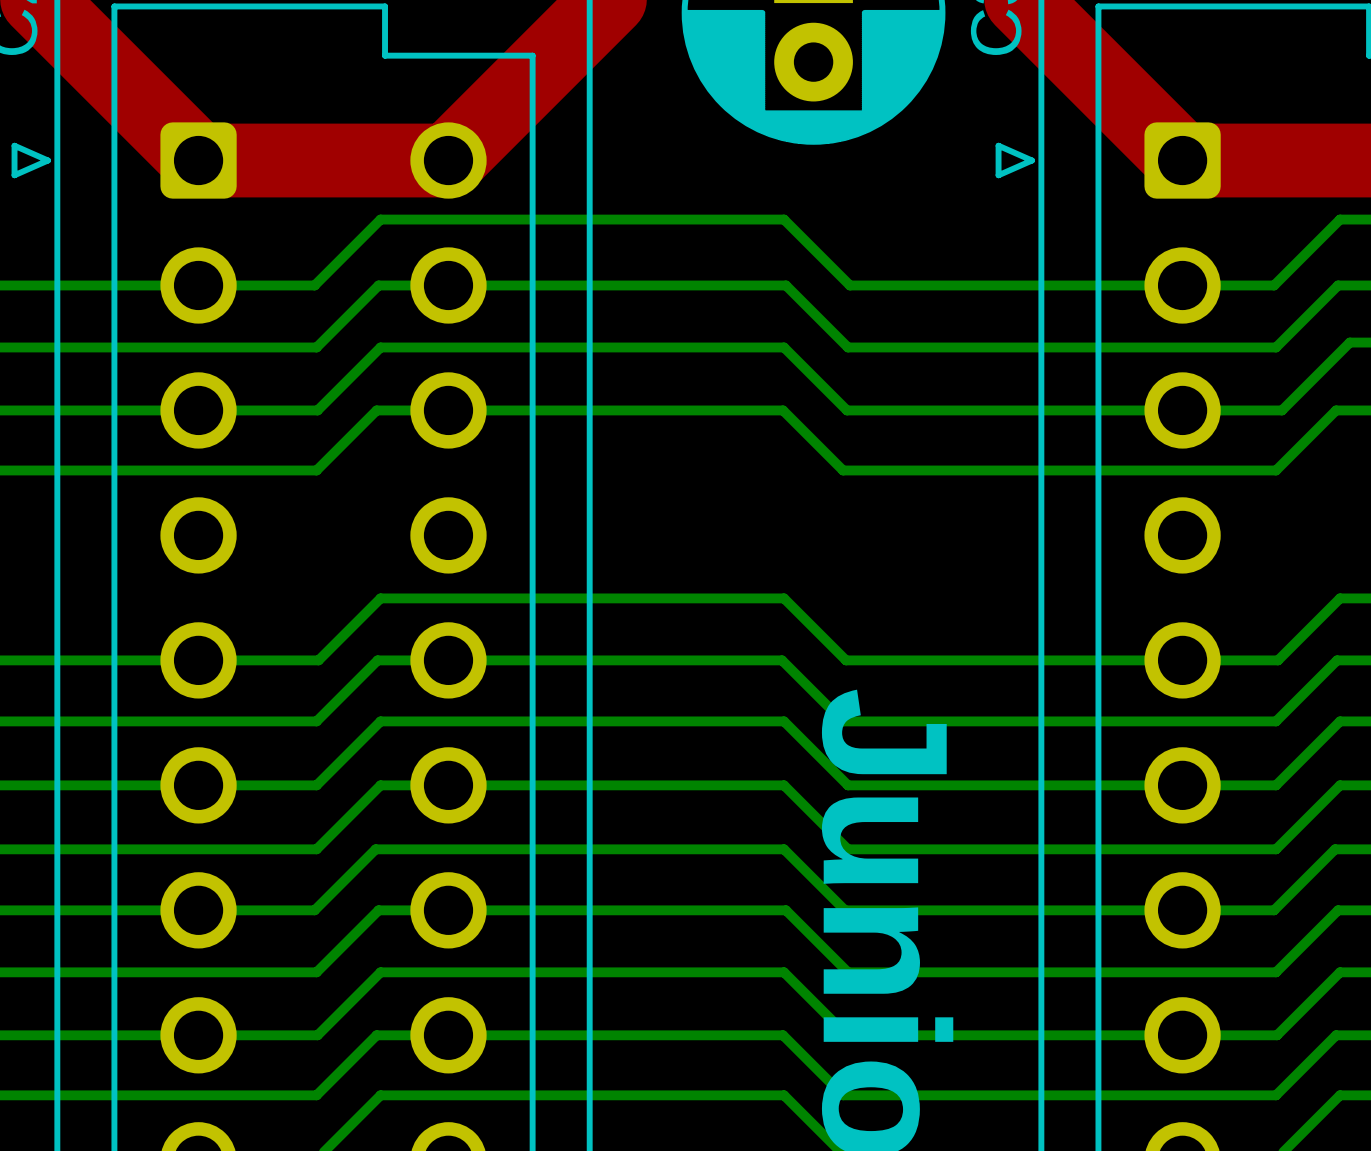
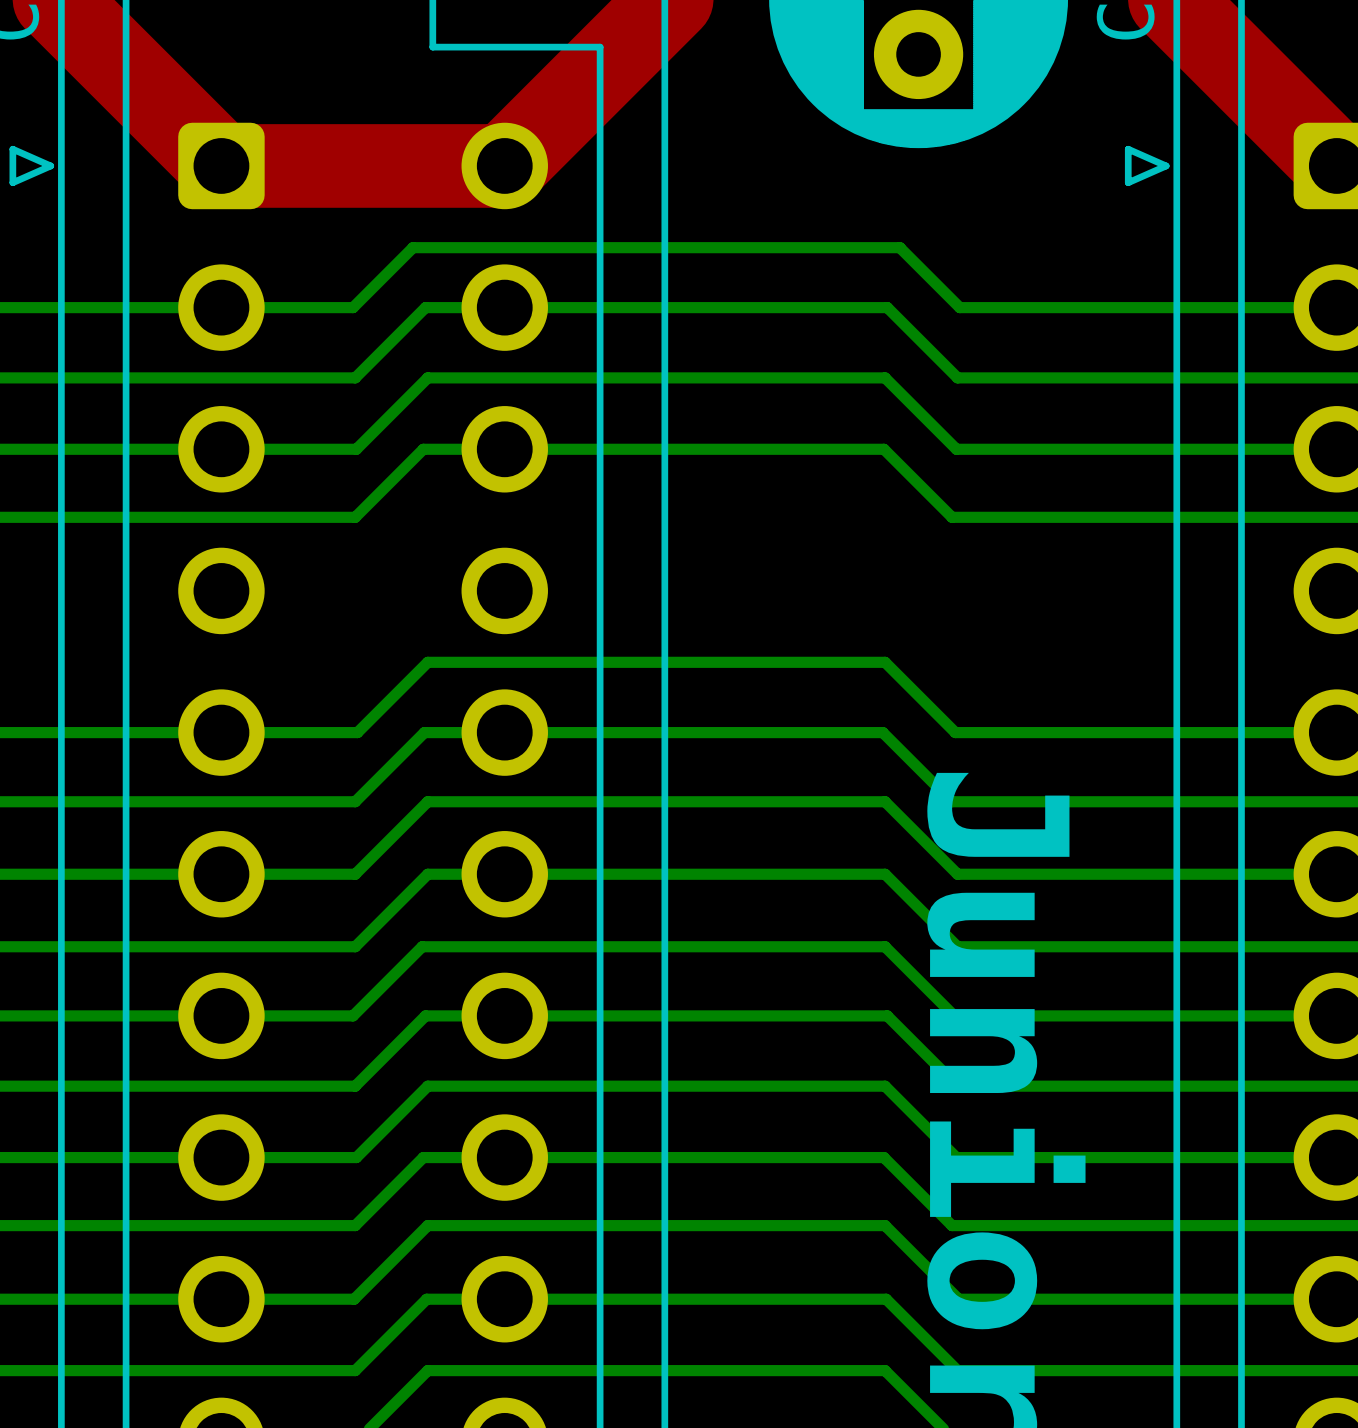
bottom track: (367, 232) (380, 219) (784, 219) (797, 232) -> (413, 247) (899, 247)

